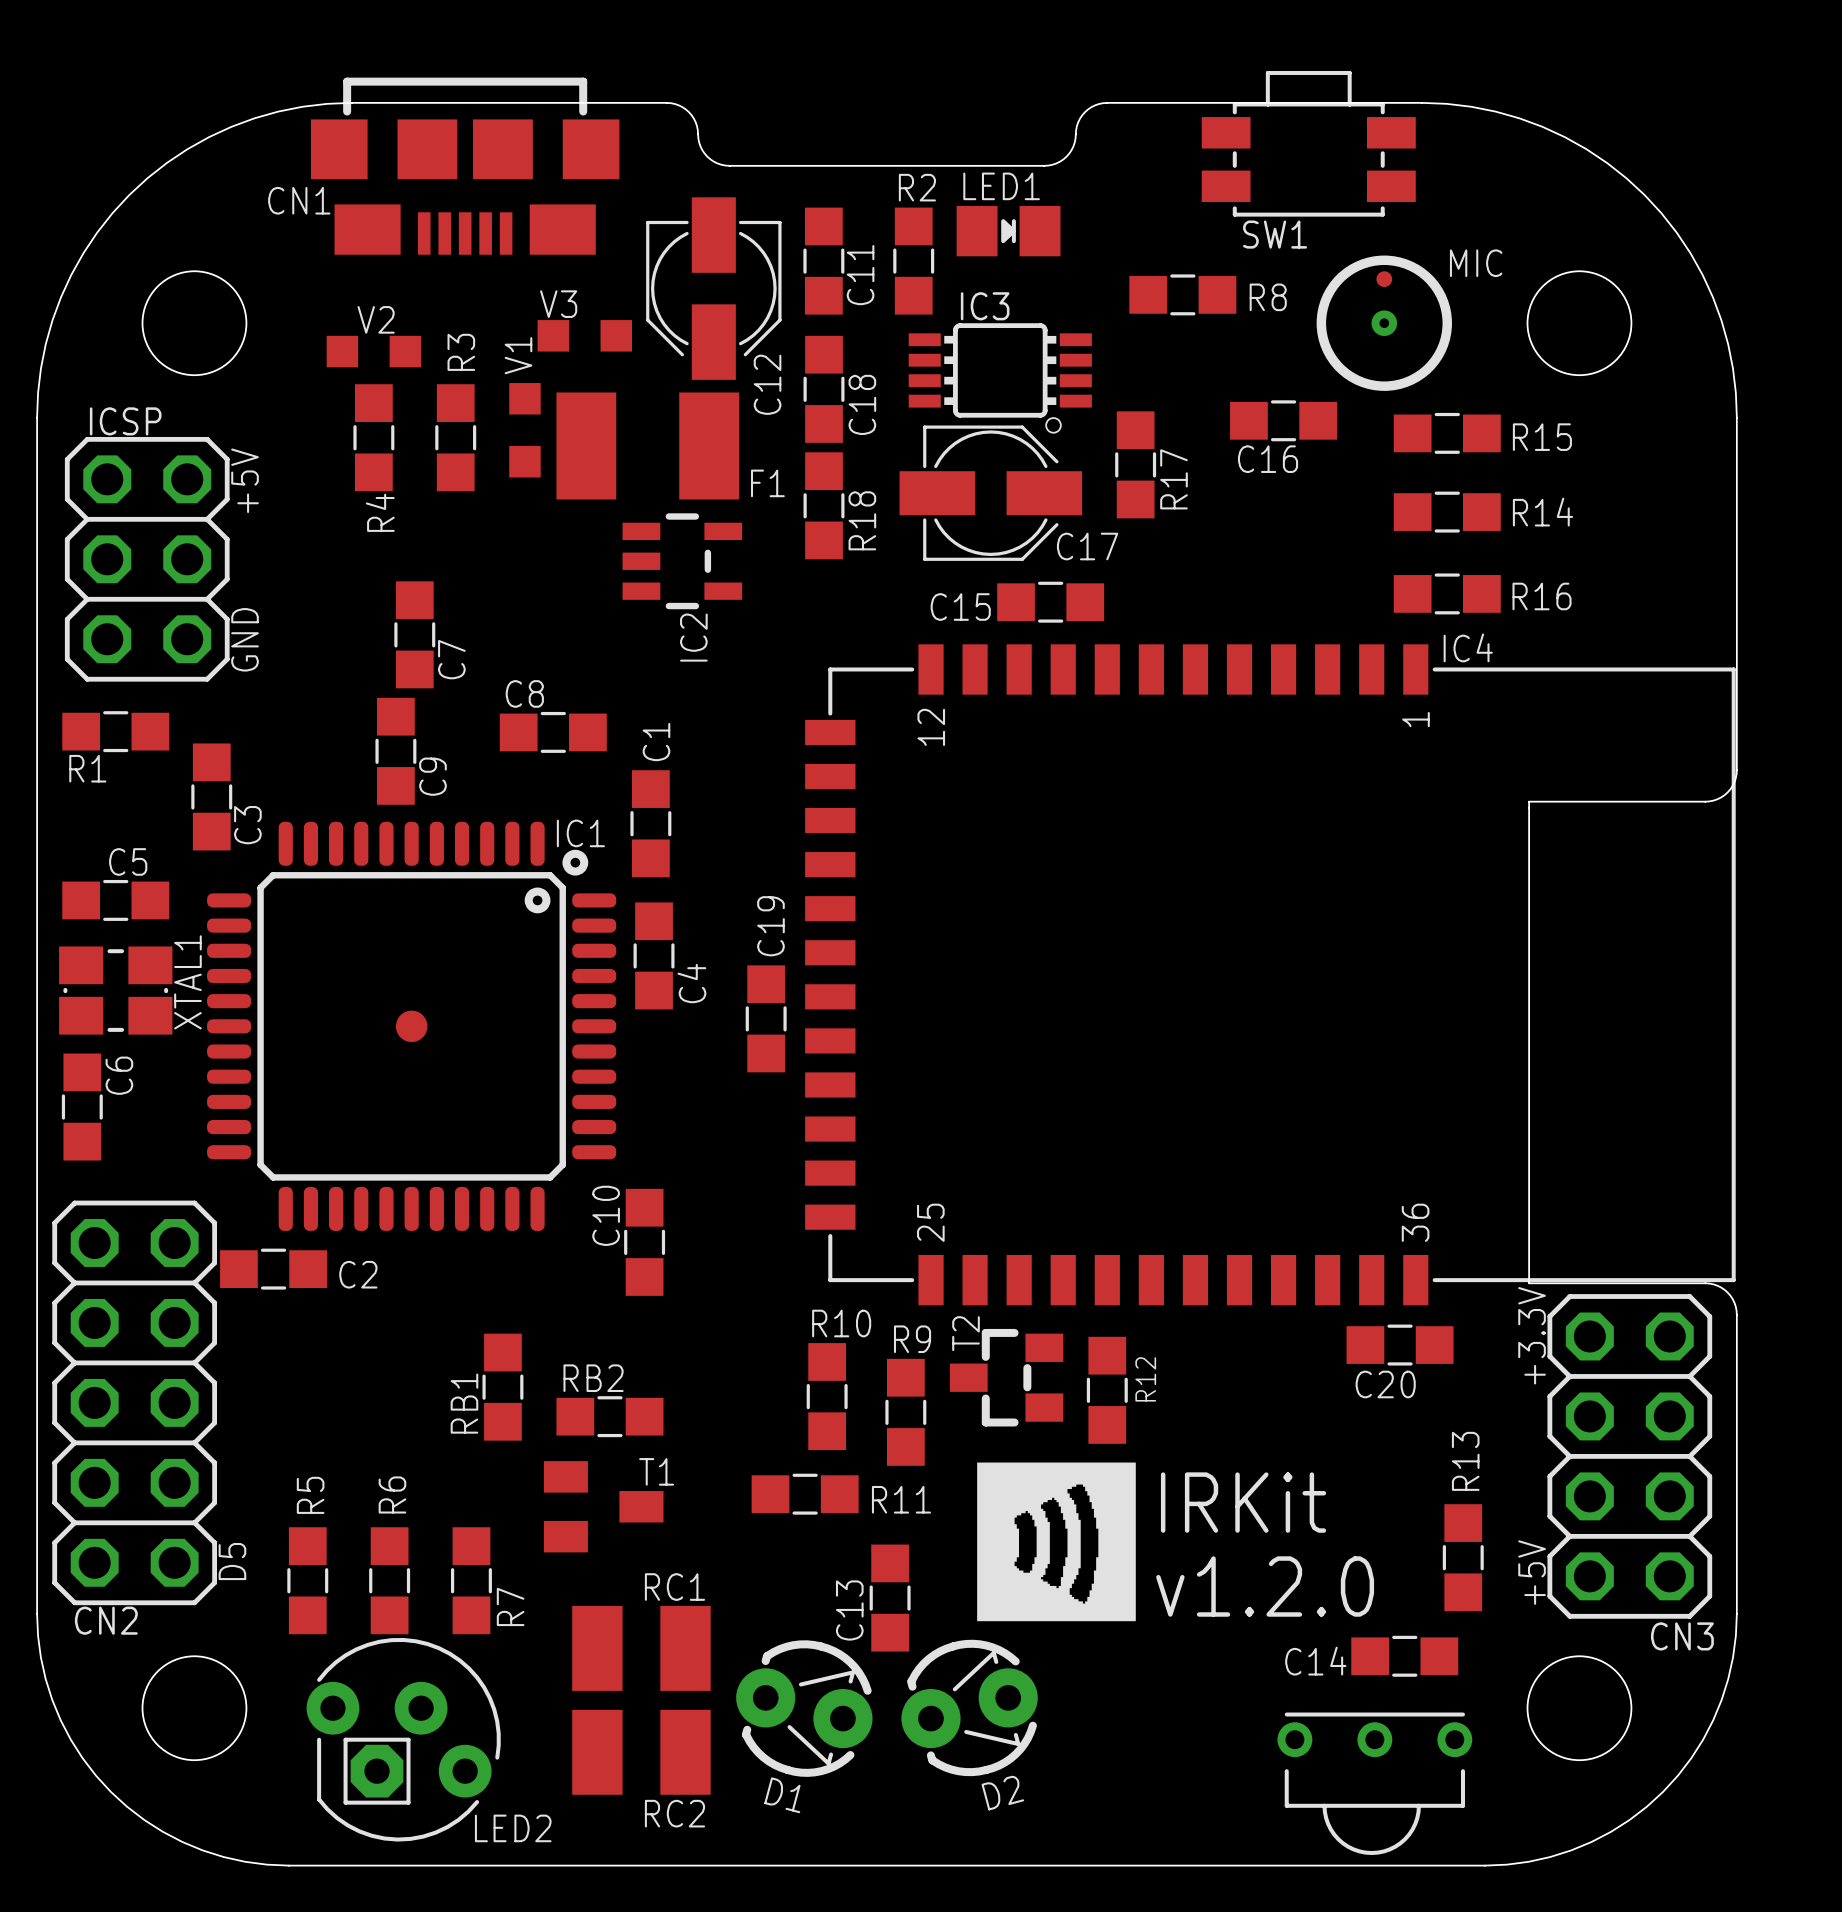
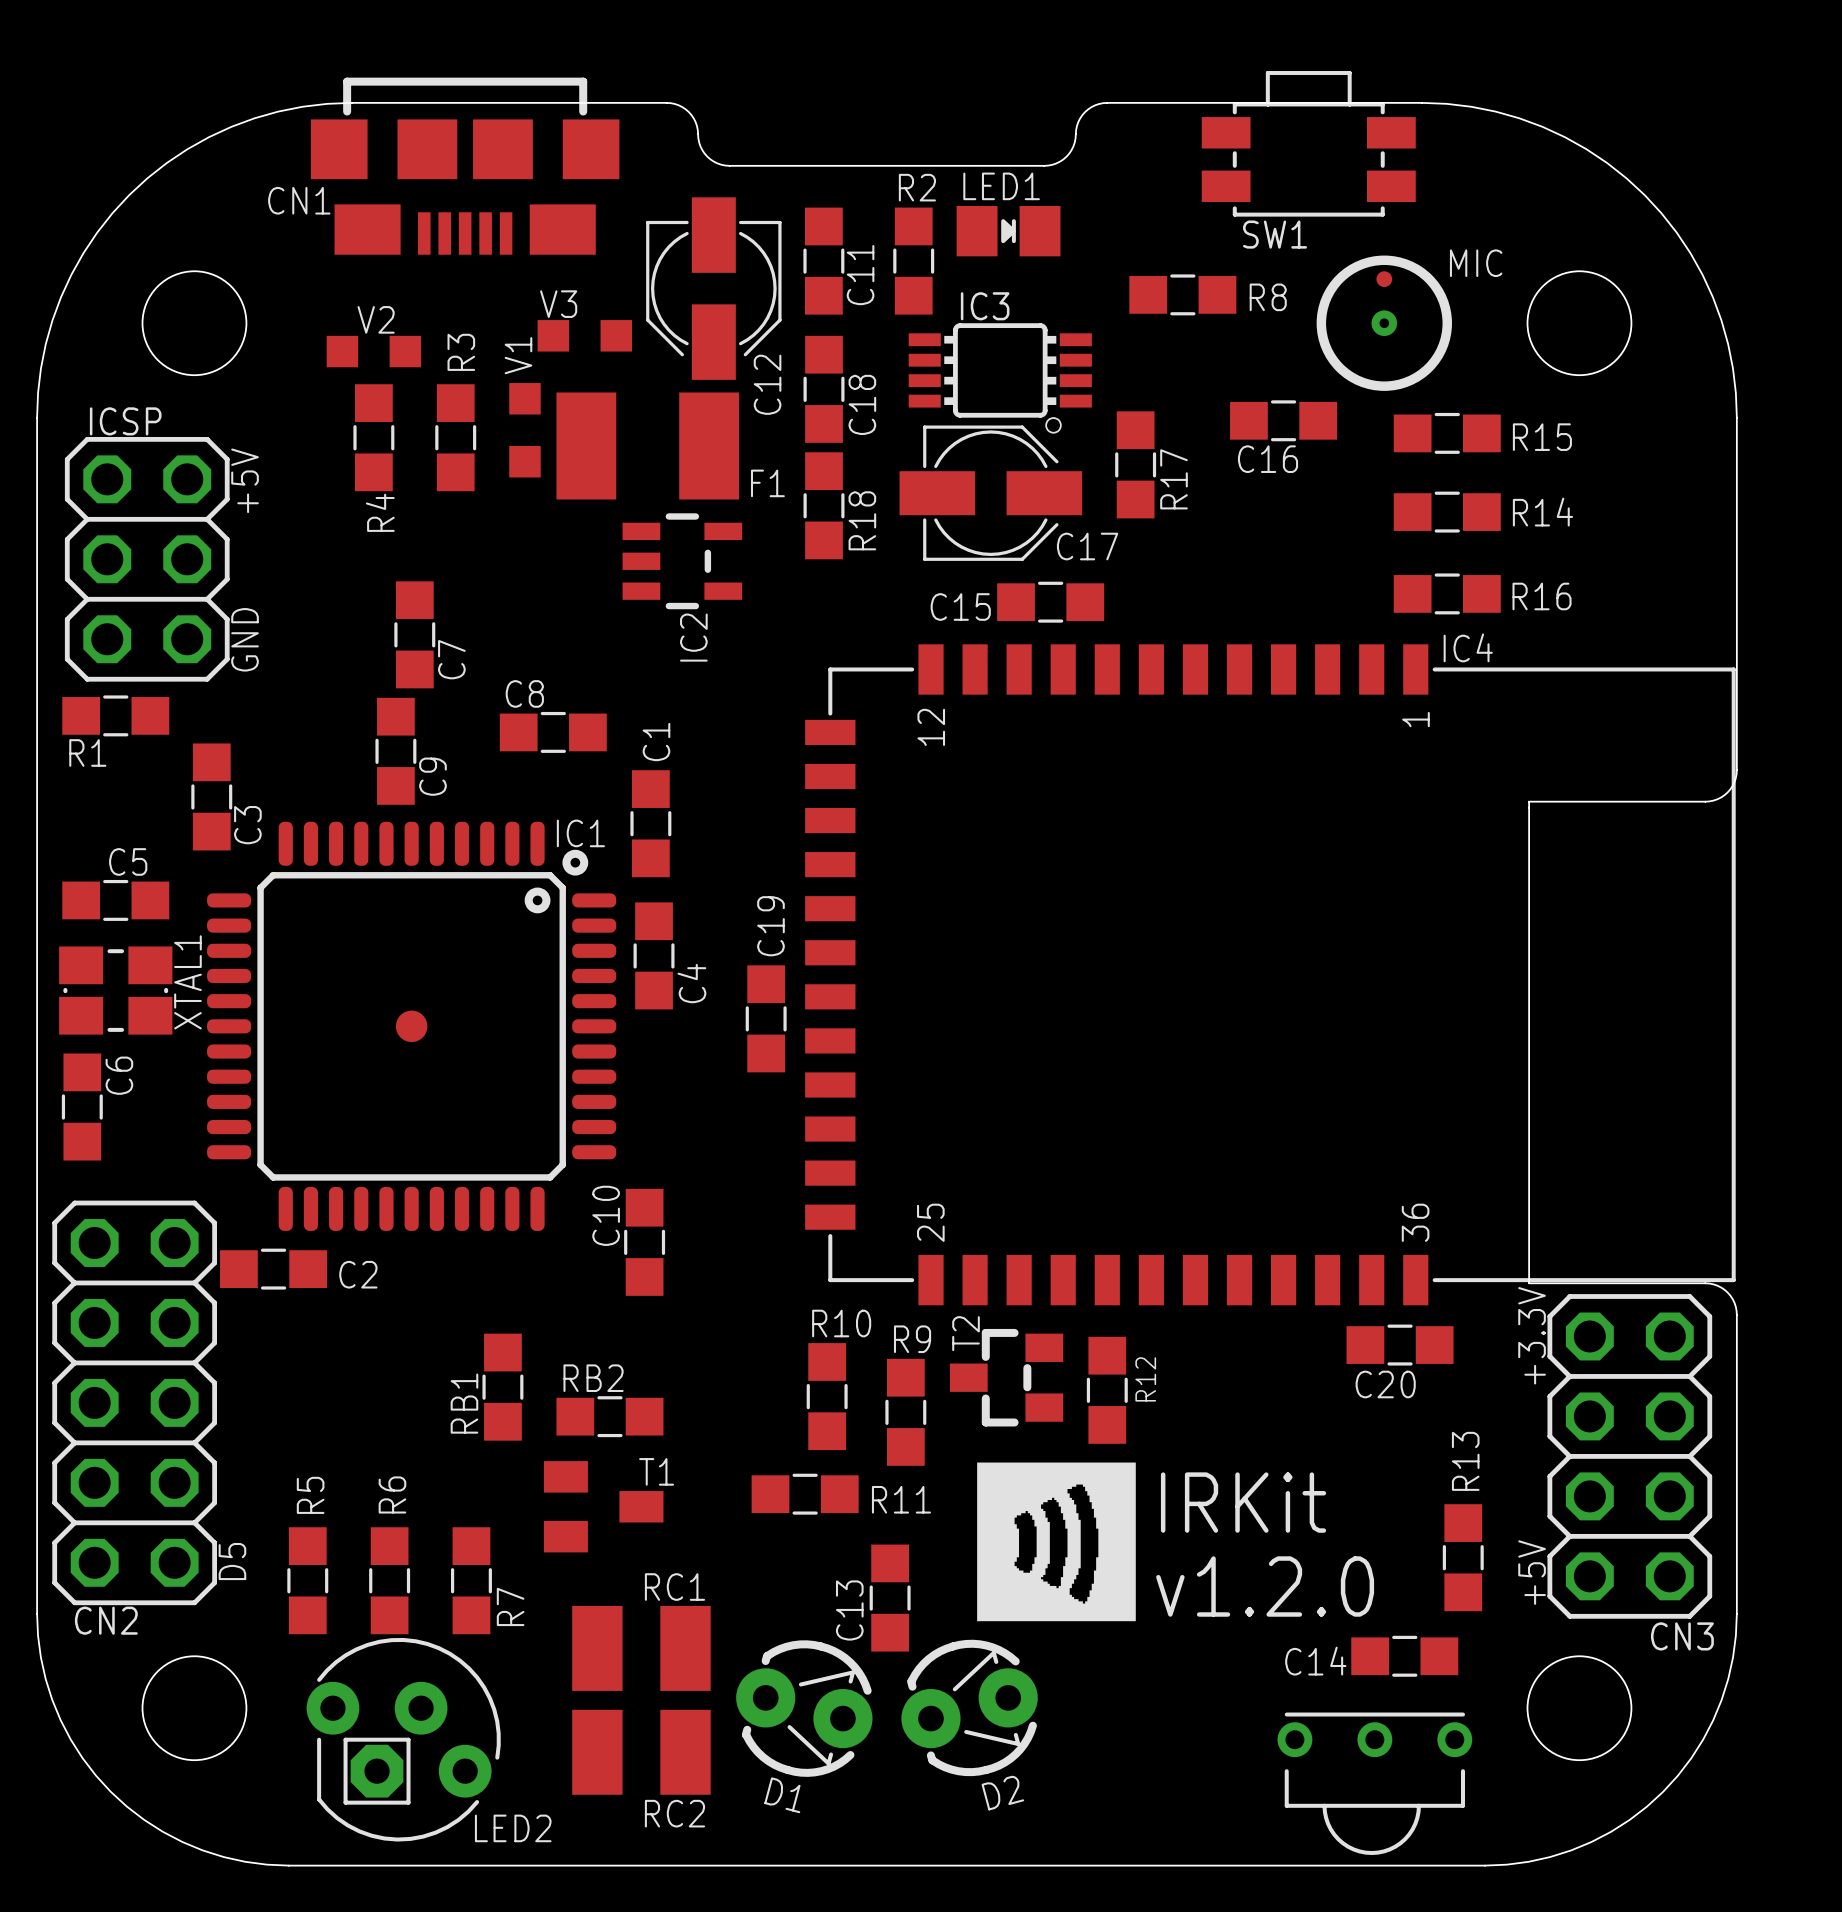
R1 position: (115, 731) -> (115, 715)

